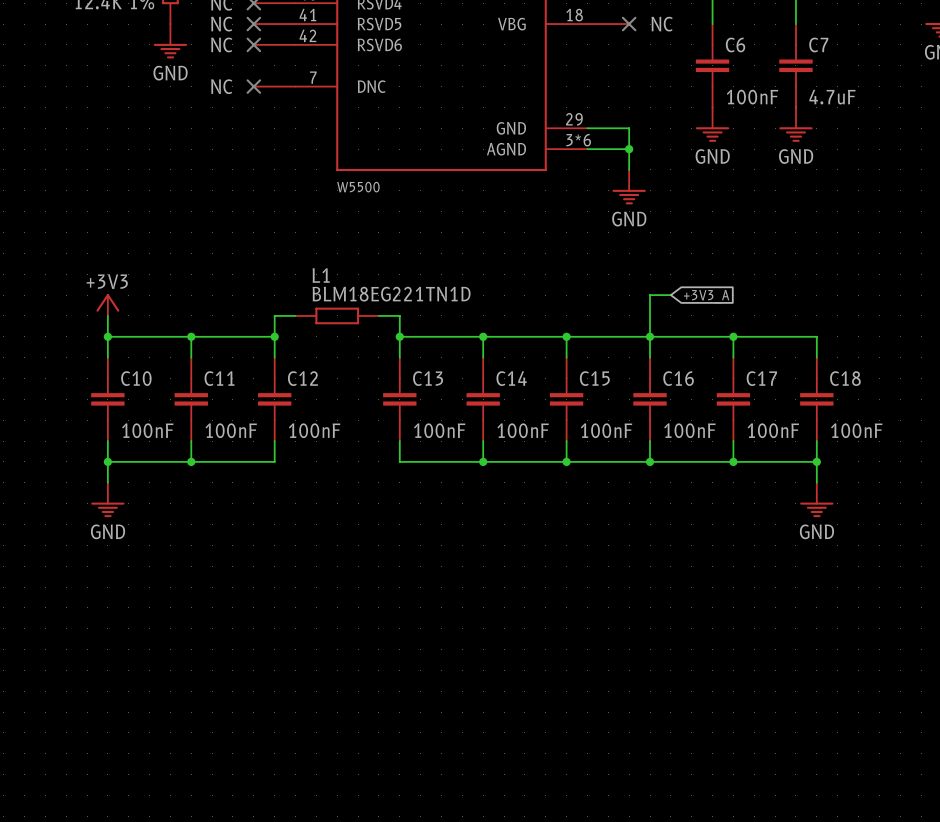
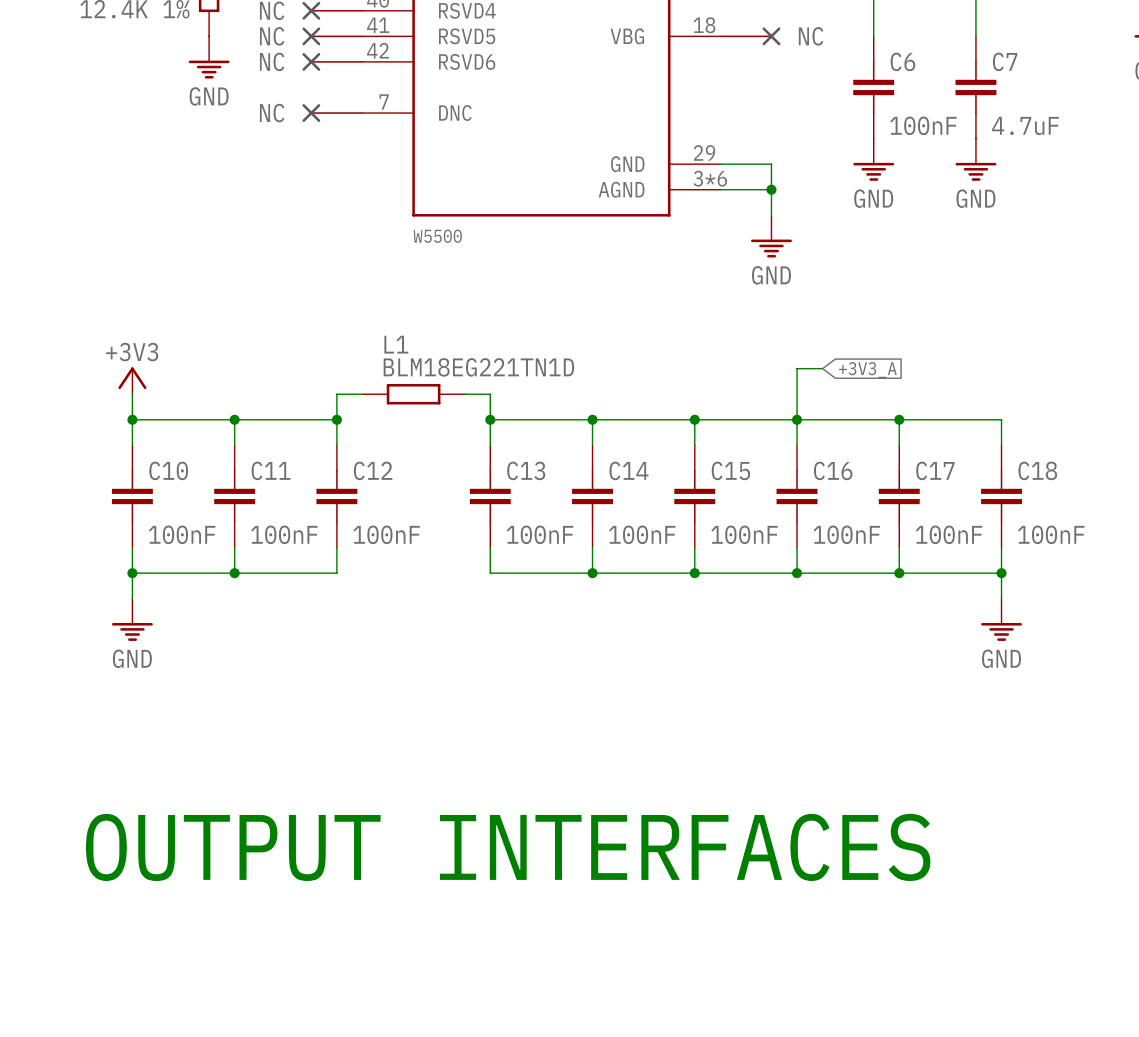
text: none -> OUTPUT INTERFACES (508, 847)

